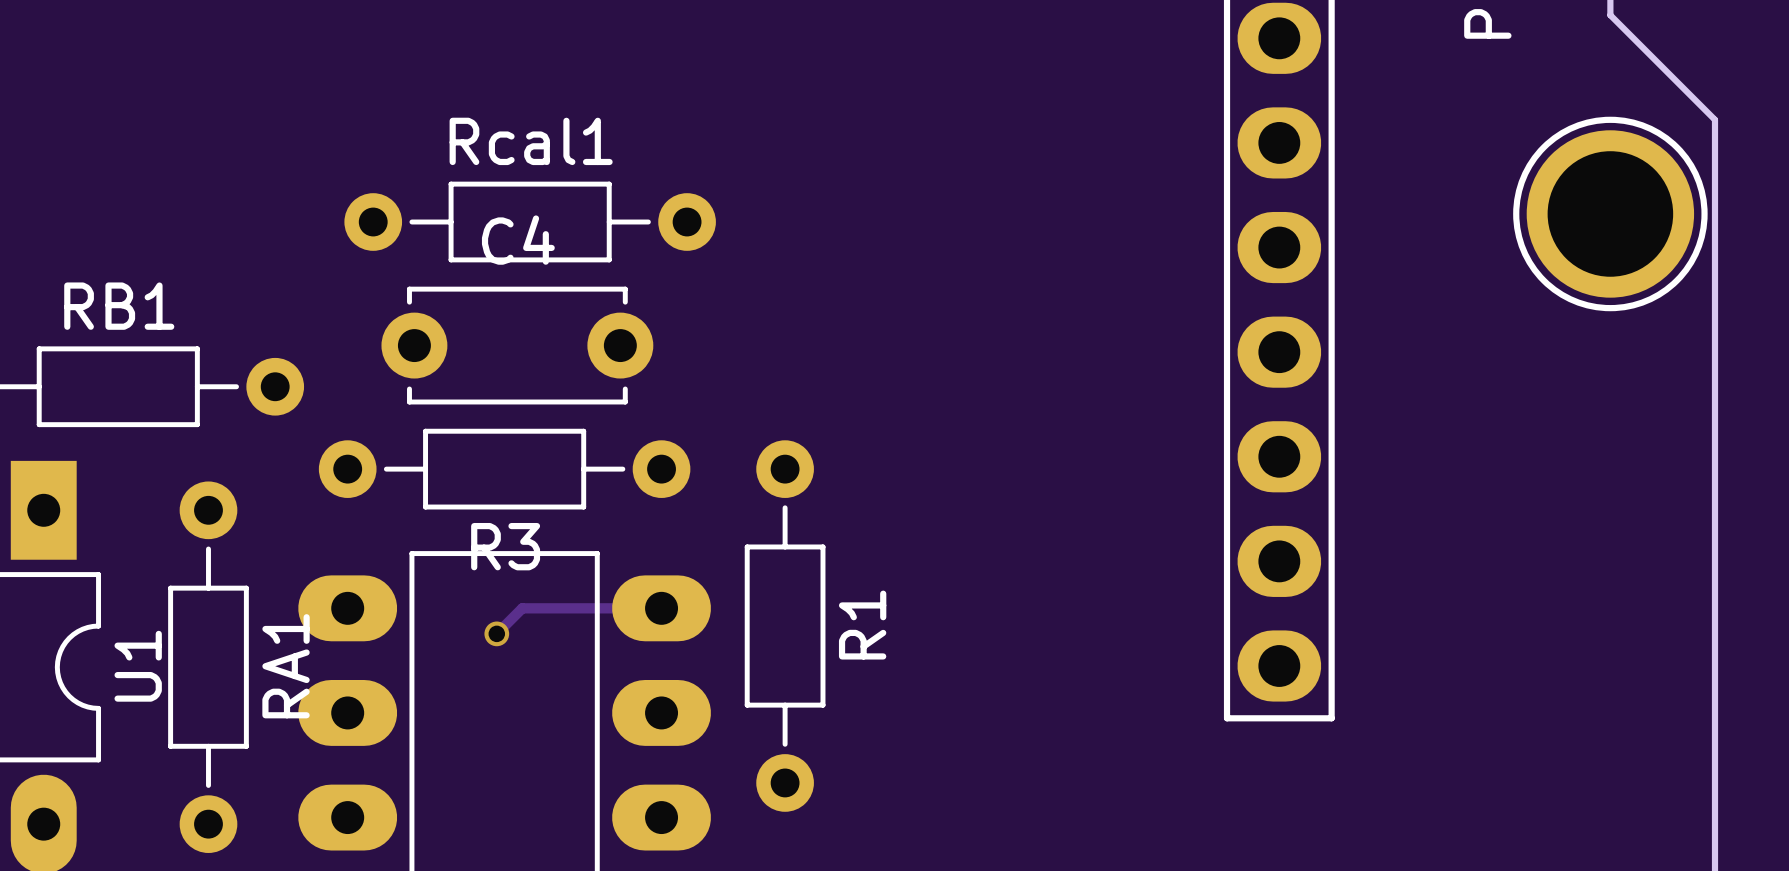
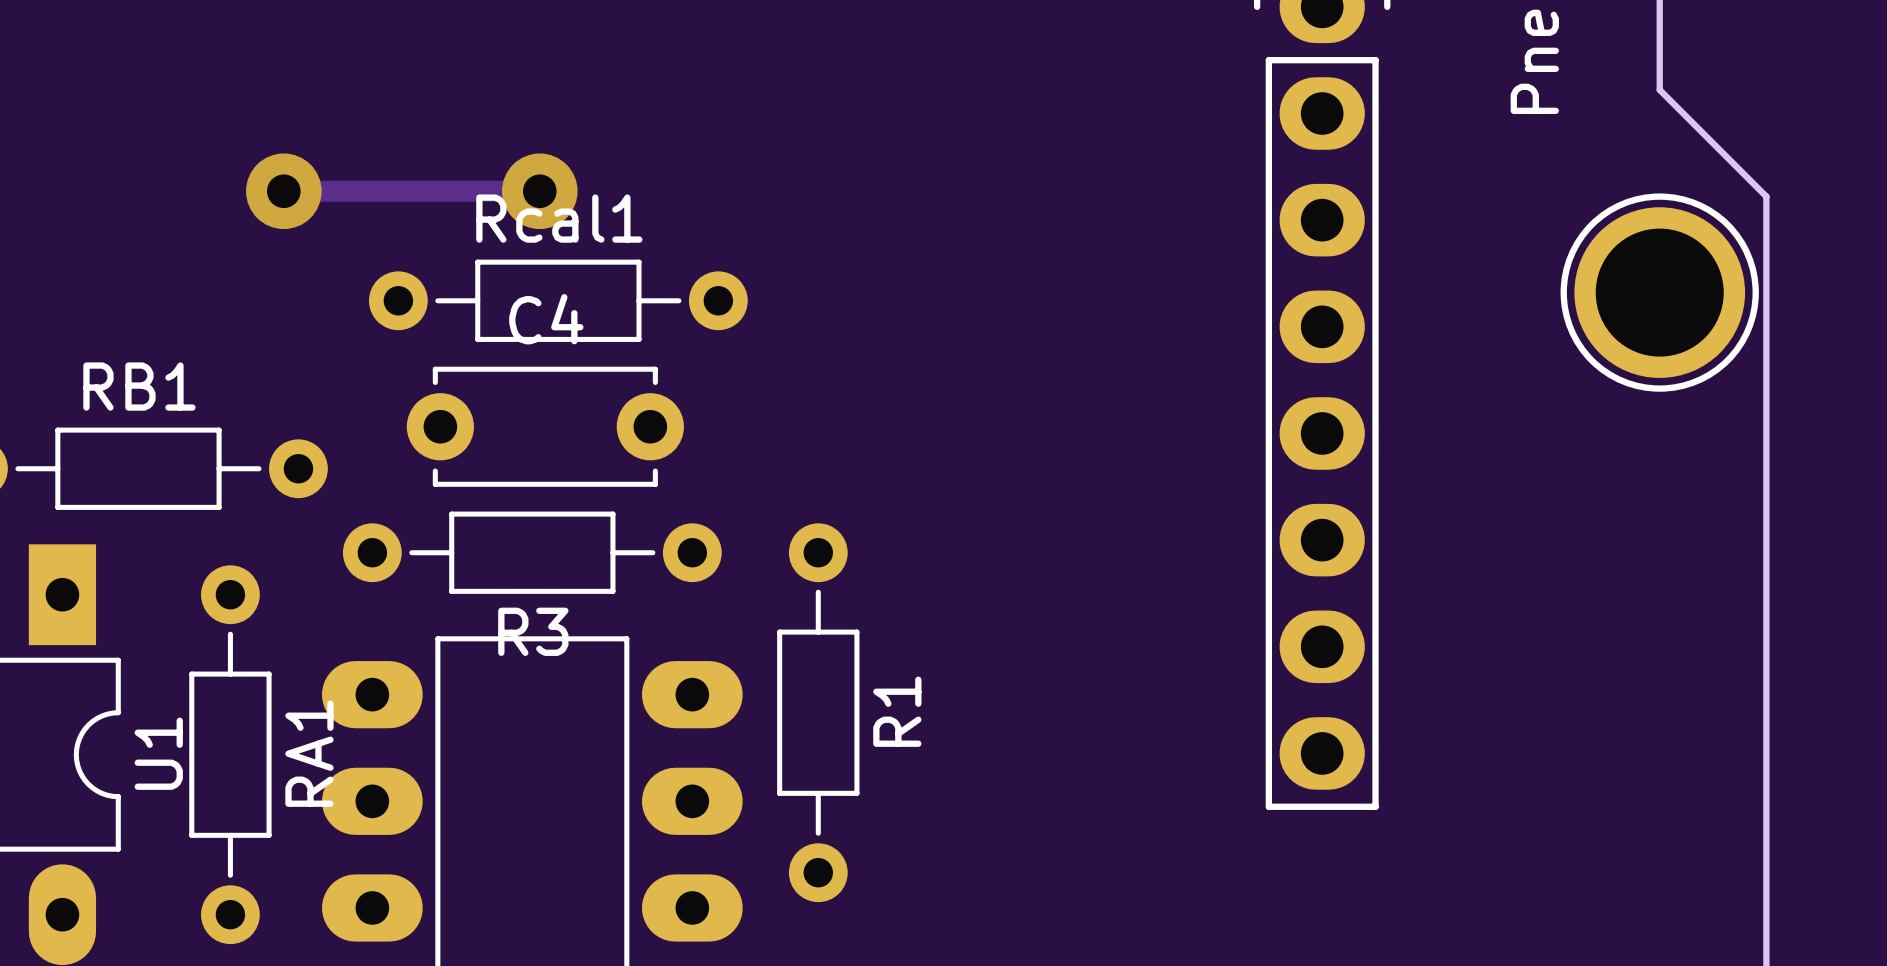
track: none -> (283, 191) (539, 191)
via: none -> (283, 191)
via: none -> (539, 191)
track: (661, 608) (522, 608) (496, 633) -> none
via: (496, 633) -> none

